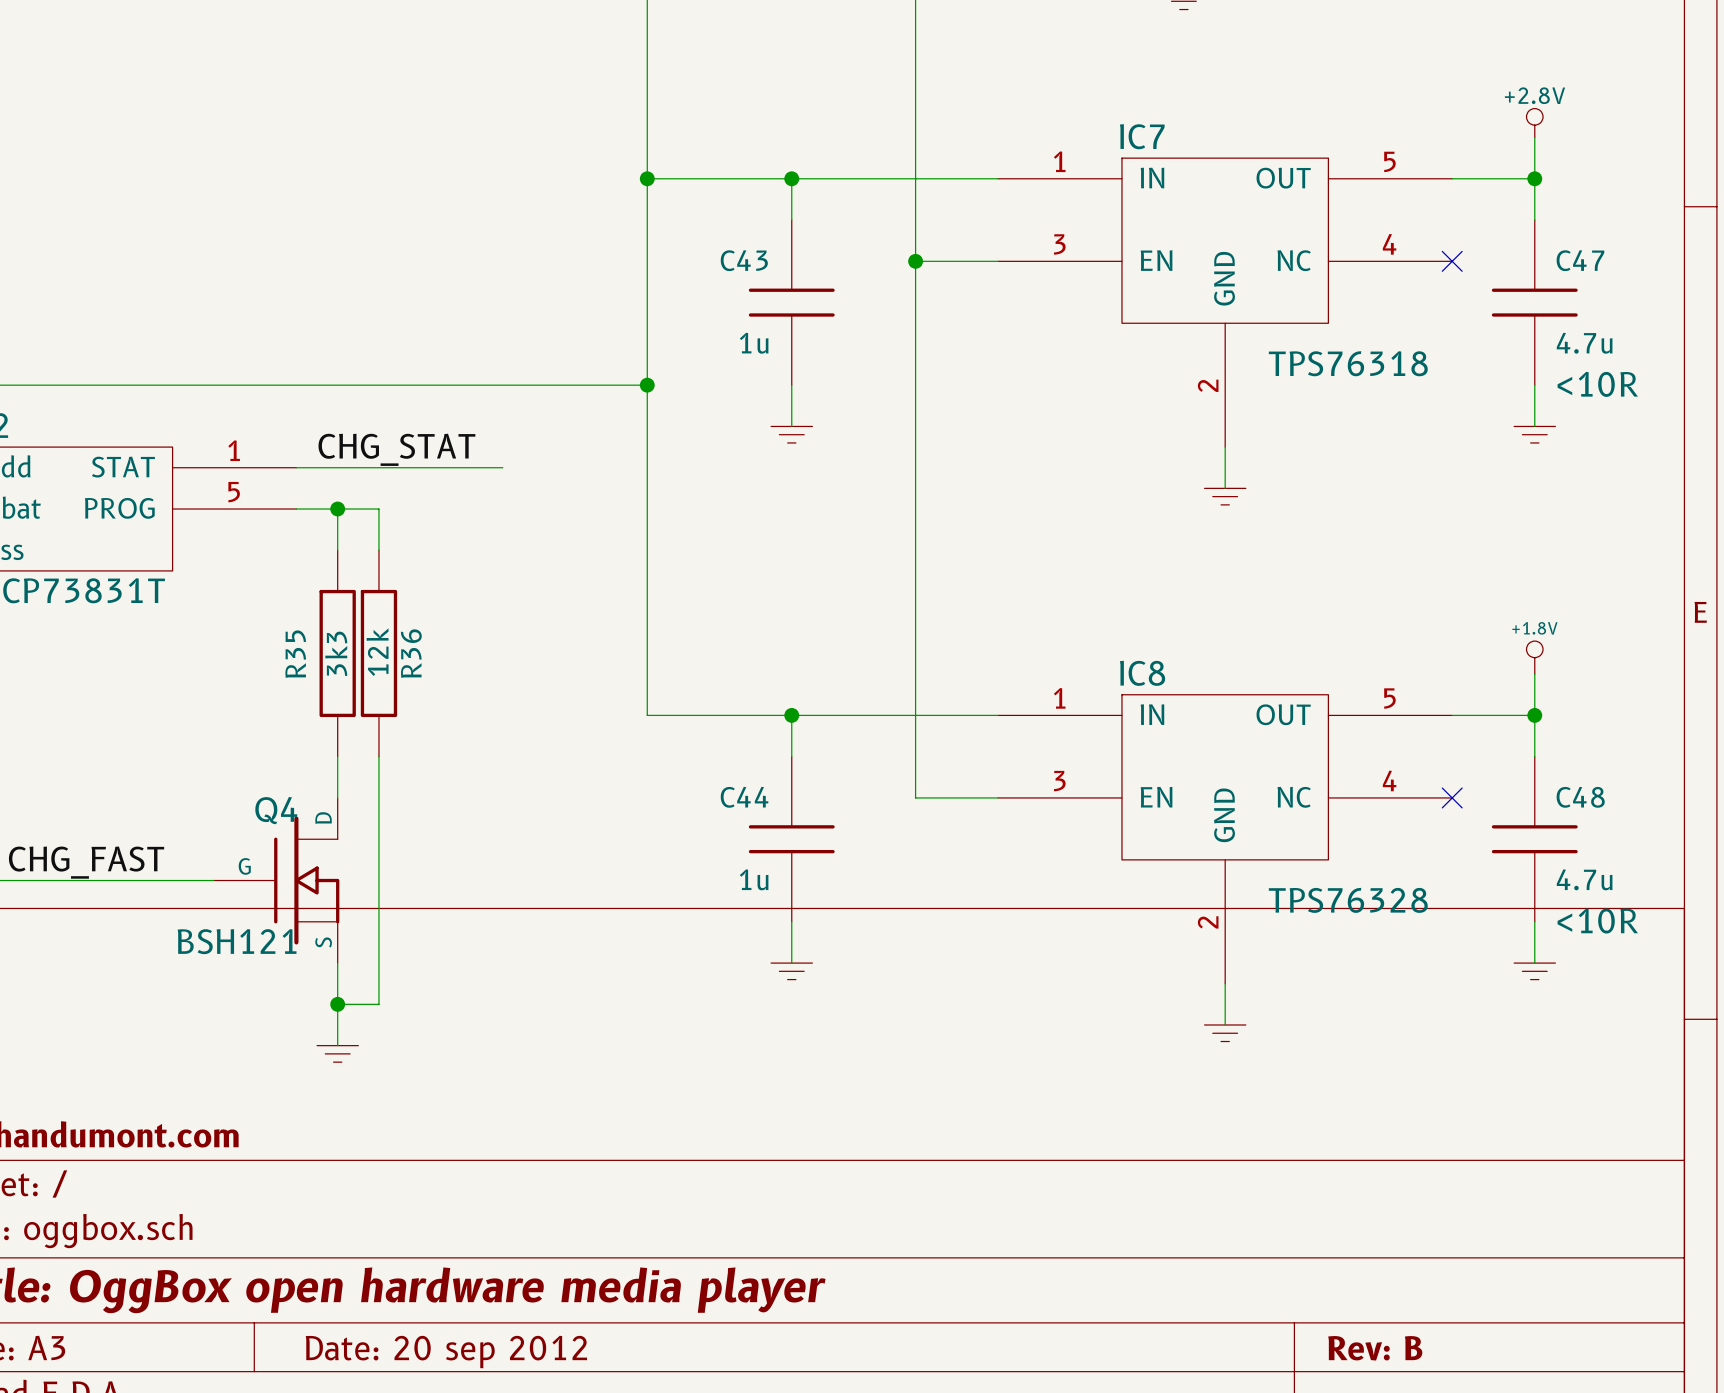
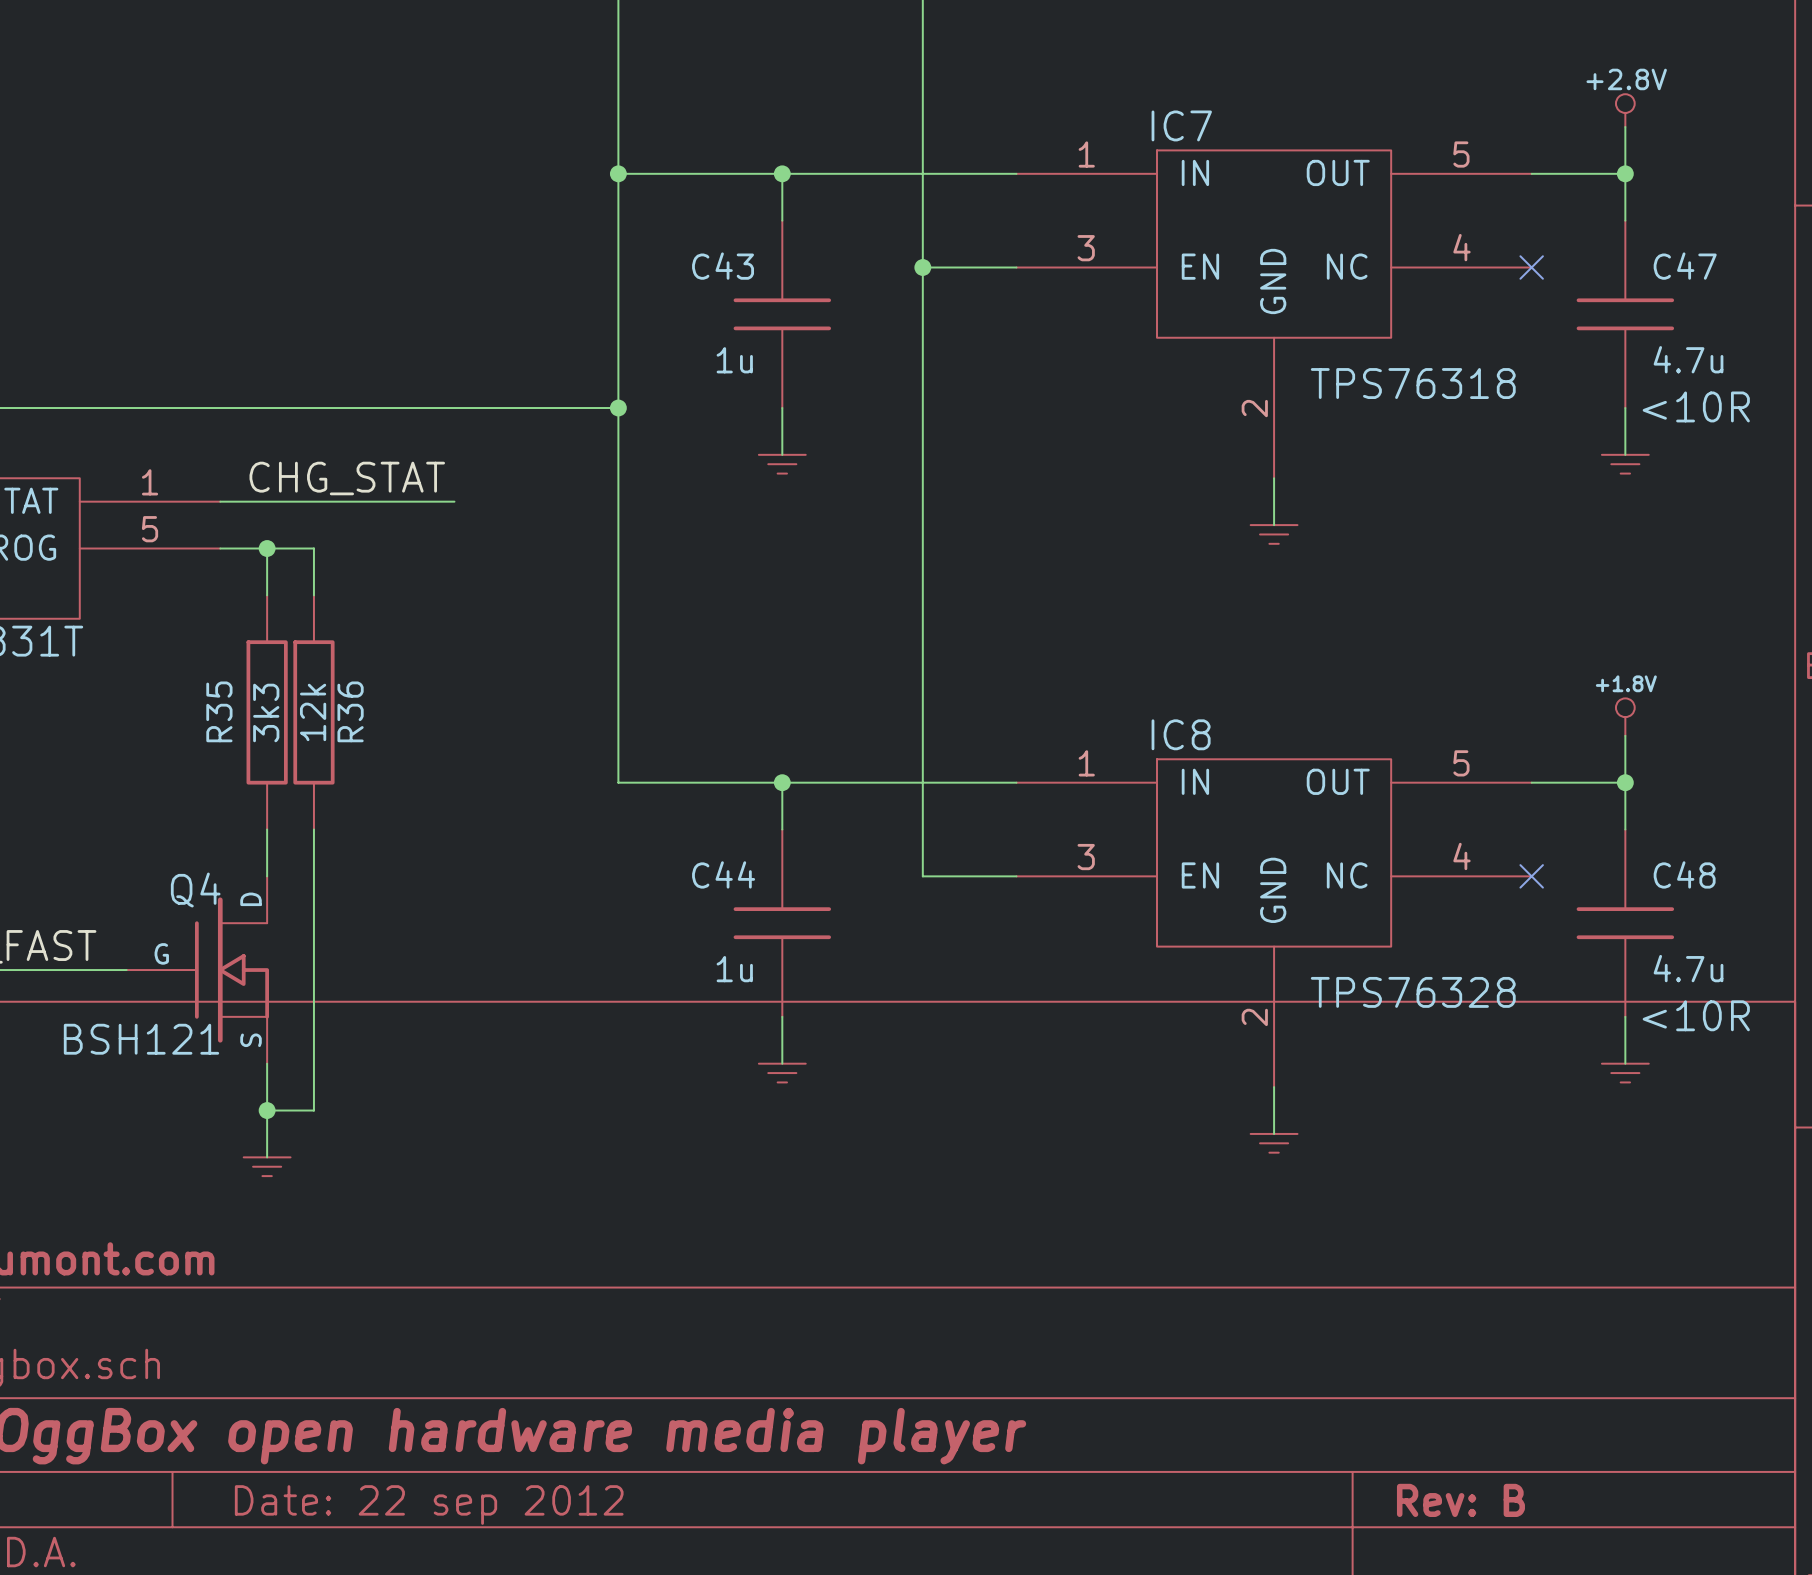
title block: Date: 20 sep 2012 (446, 1351) -> Date: 22 sep 2012 (429, 1505)

